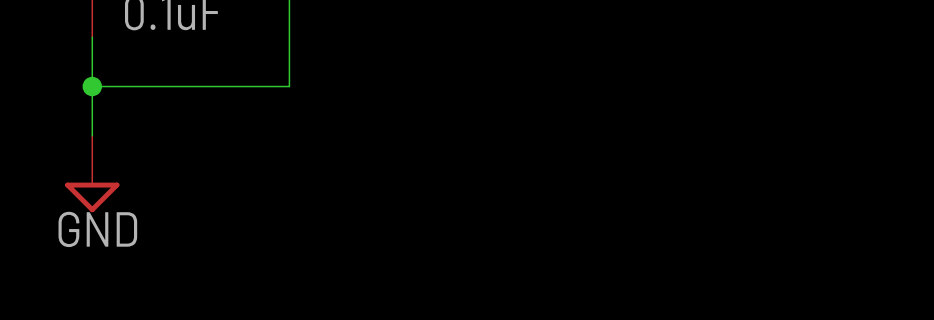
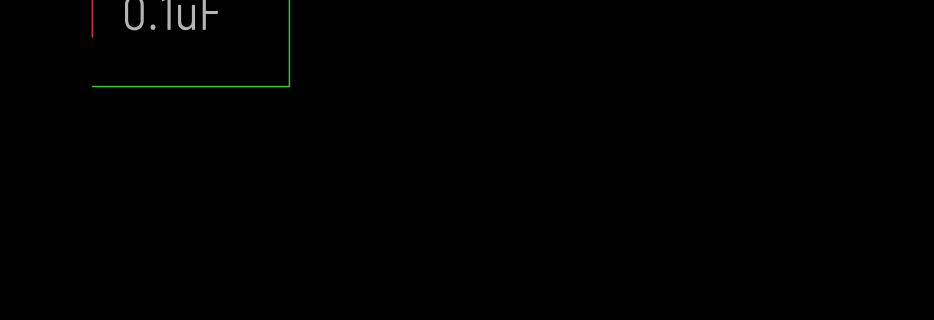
wire: (92, 37) (92, 135) -> none
junction: (92, 86) -> none
power symbol: GND (92, 174) -> none

